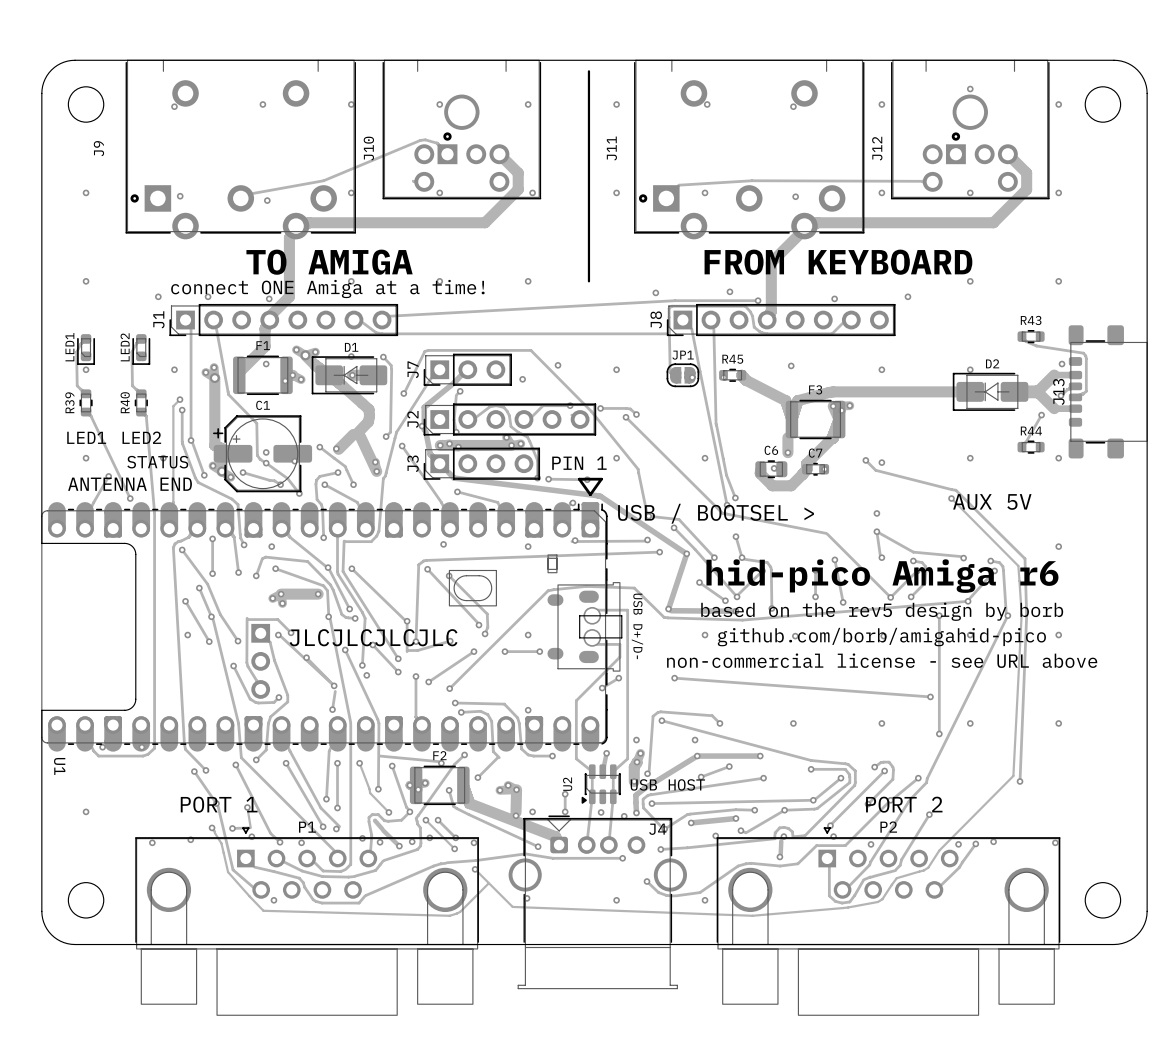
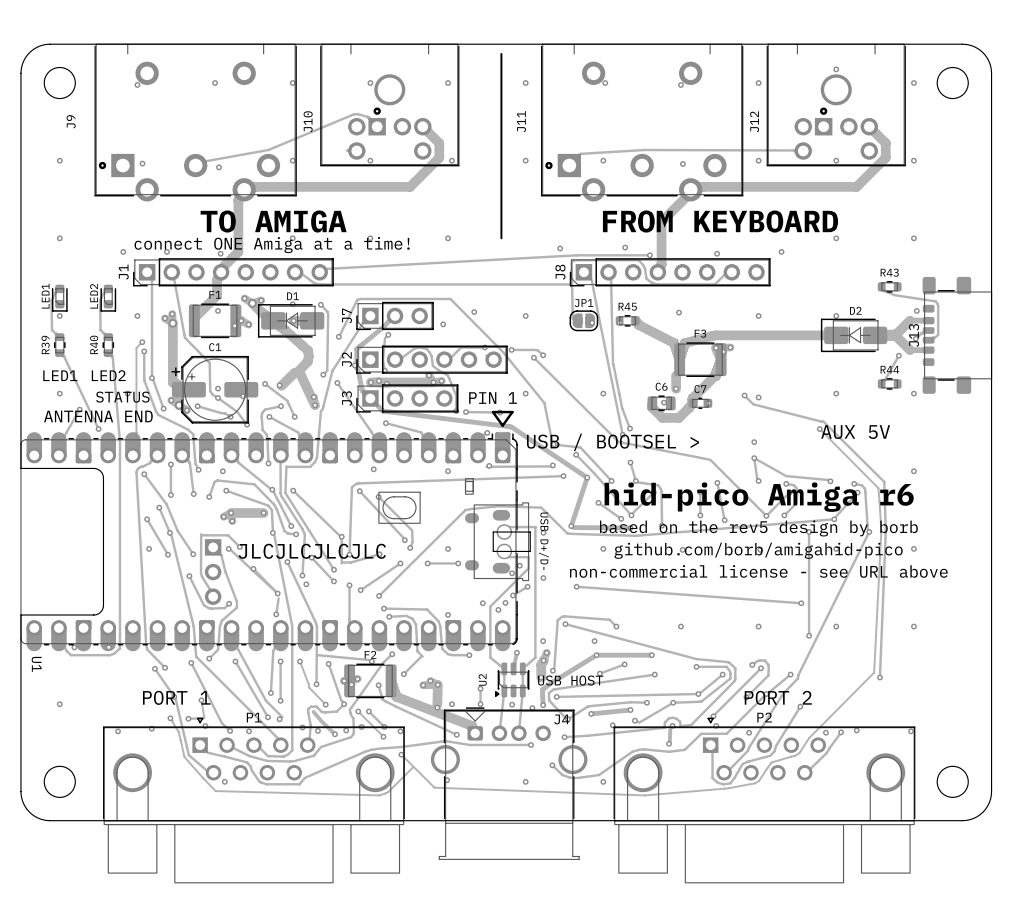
via: none -> (543, 532)
via: none -> (519, 565)
via: none -> (512, 573)
via: none -> (543, 578)
via: none -> (482, 603)
via: none -> (505, 602)
via: none -> (498, 609)

